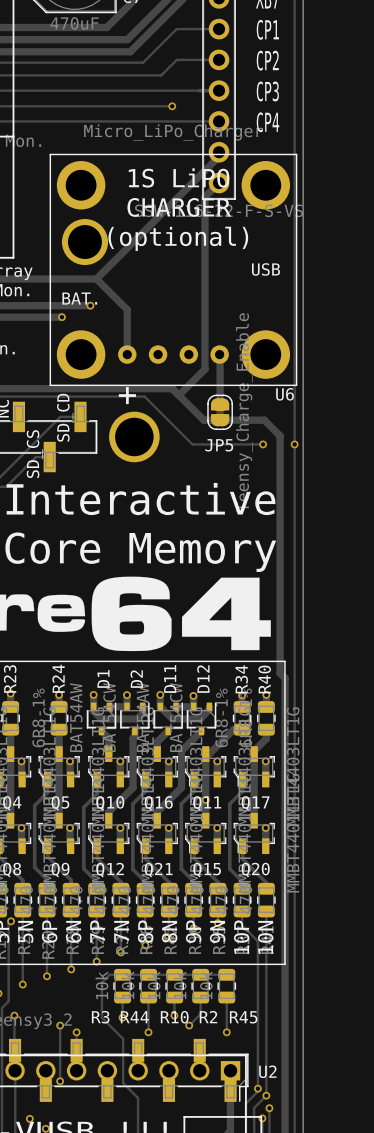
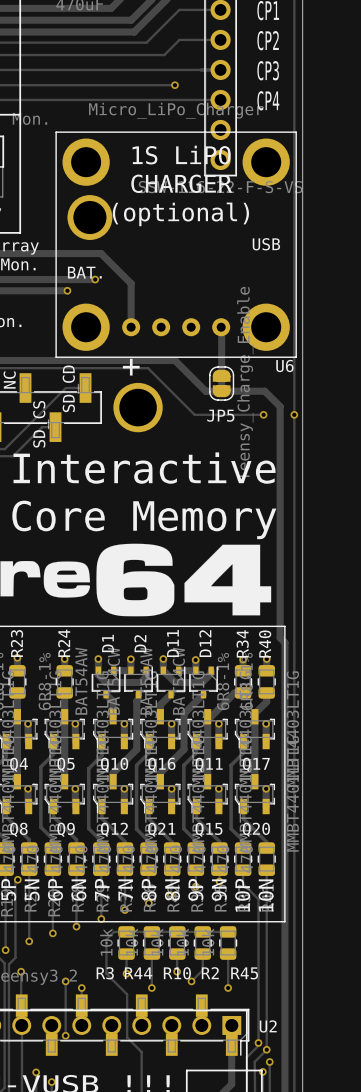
track: (219, 152) (219, 156) (96, 279) -> none
track: (219, 183) (204, 197) (204, 369) (178, 395) -> none
via: (205, 799) -> none

